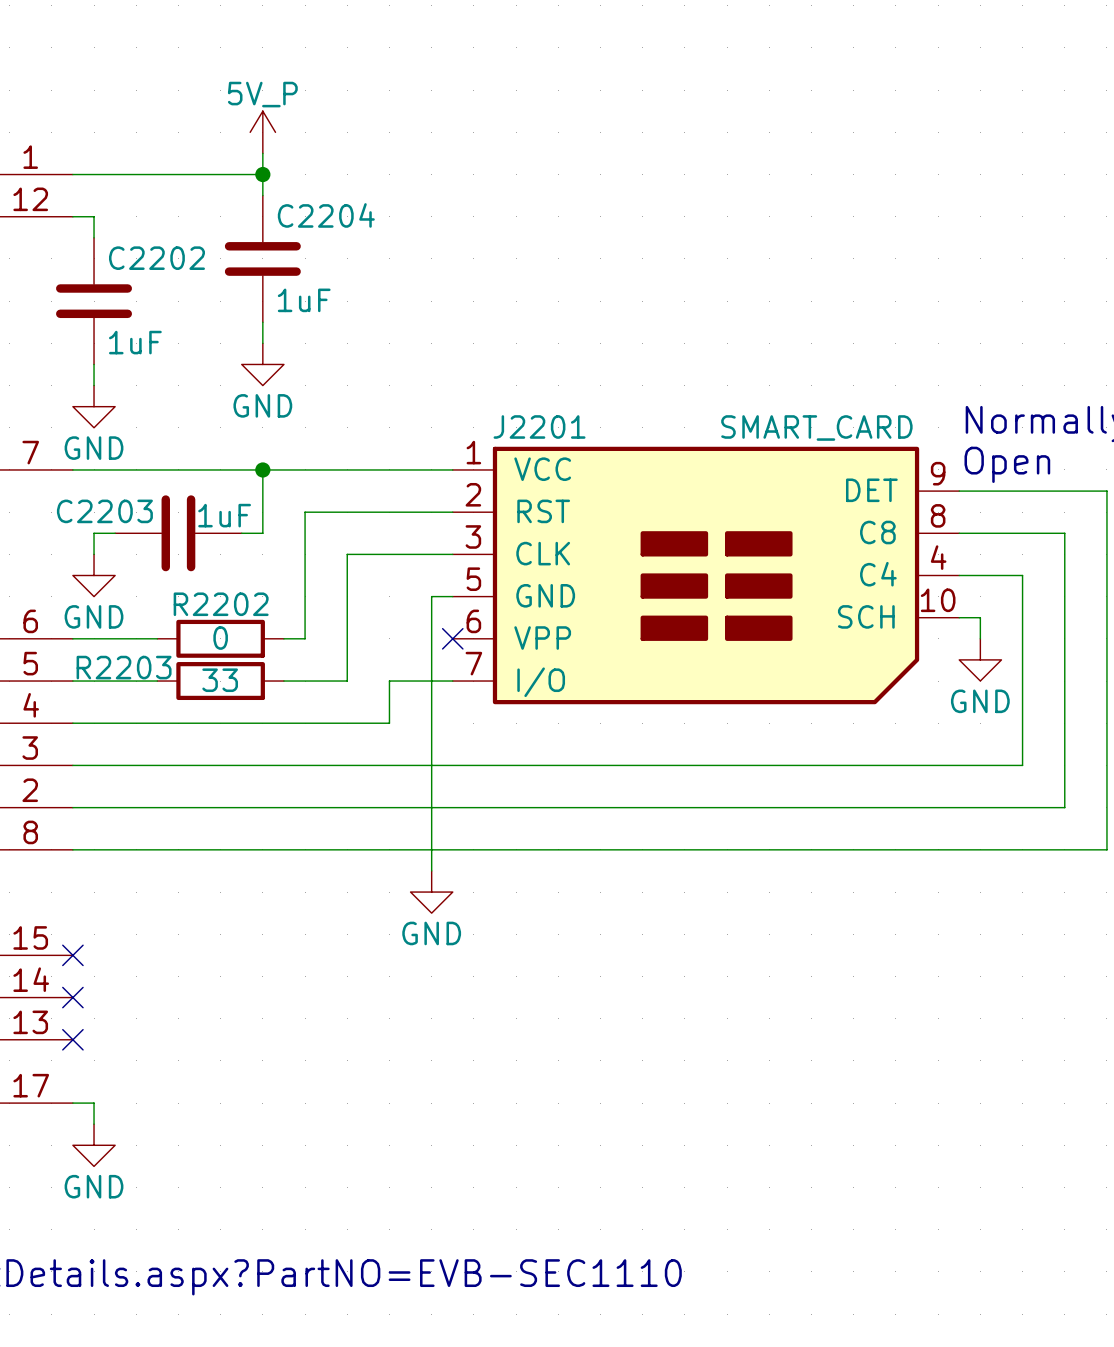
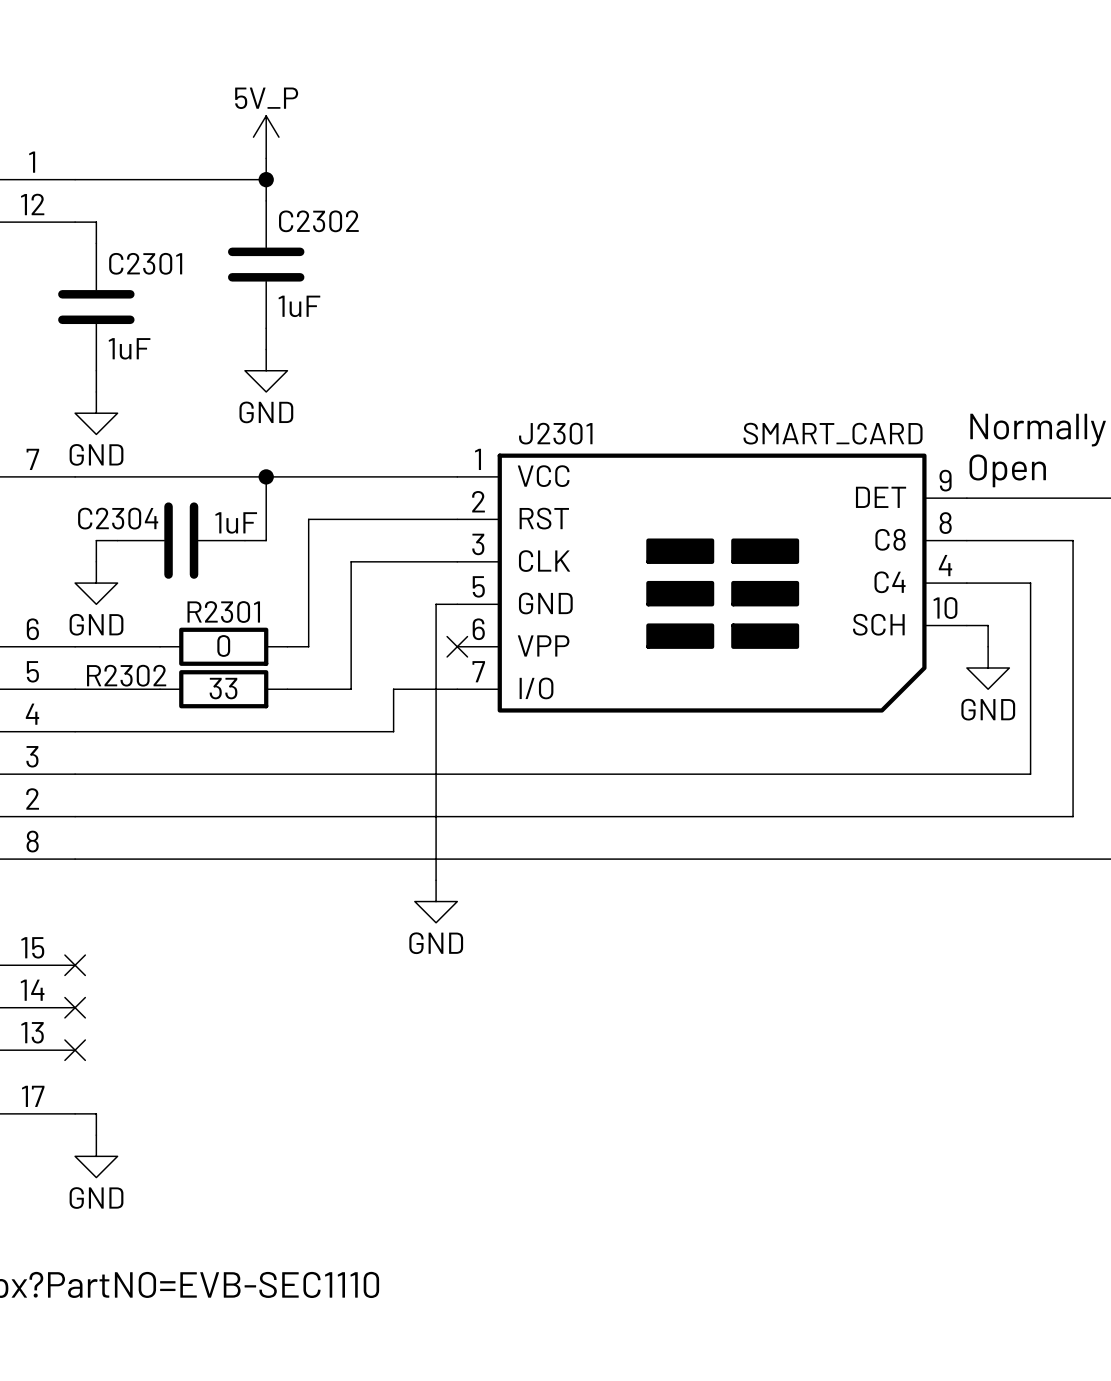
C2204 name: C2204 (326, 215) -> C2302 (318, 221)
C2202 name: C2202 (156, 258) -> C2301 (145, 263)
J2201 name: J2201 (539, 426) -> J2301 (555, 433)
C2203 name: C2203 (104, 511) -> C2304 (118, 518)
R2202 name: R2202 (221, 604) -> R2301 (223, 612)
R2203 name: R2203 (124, 667) -> R2302 (126, 675)

